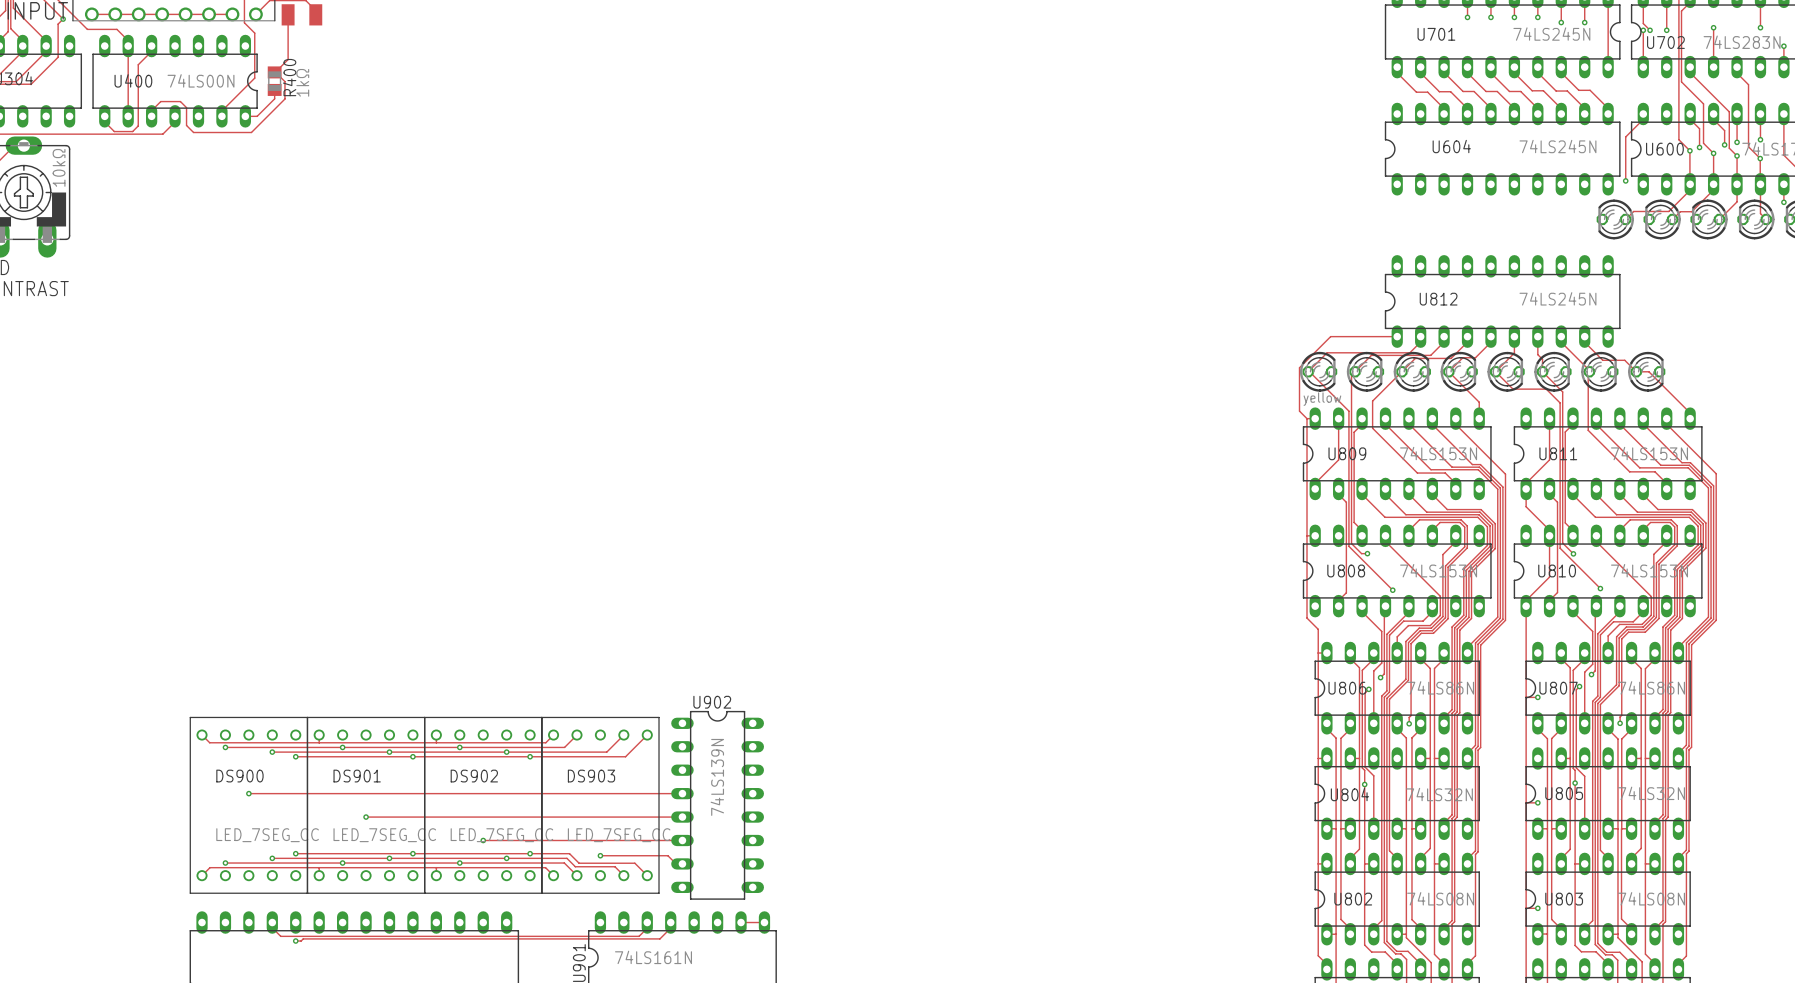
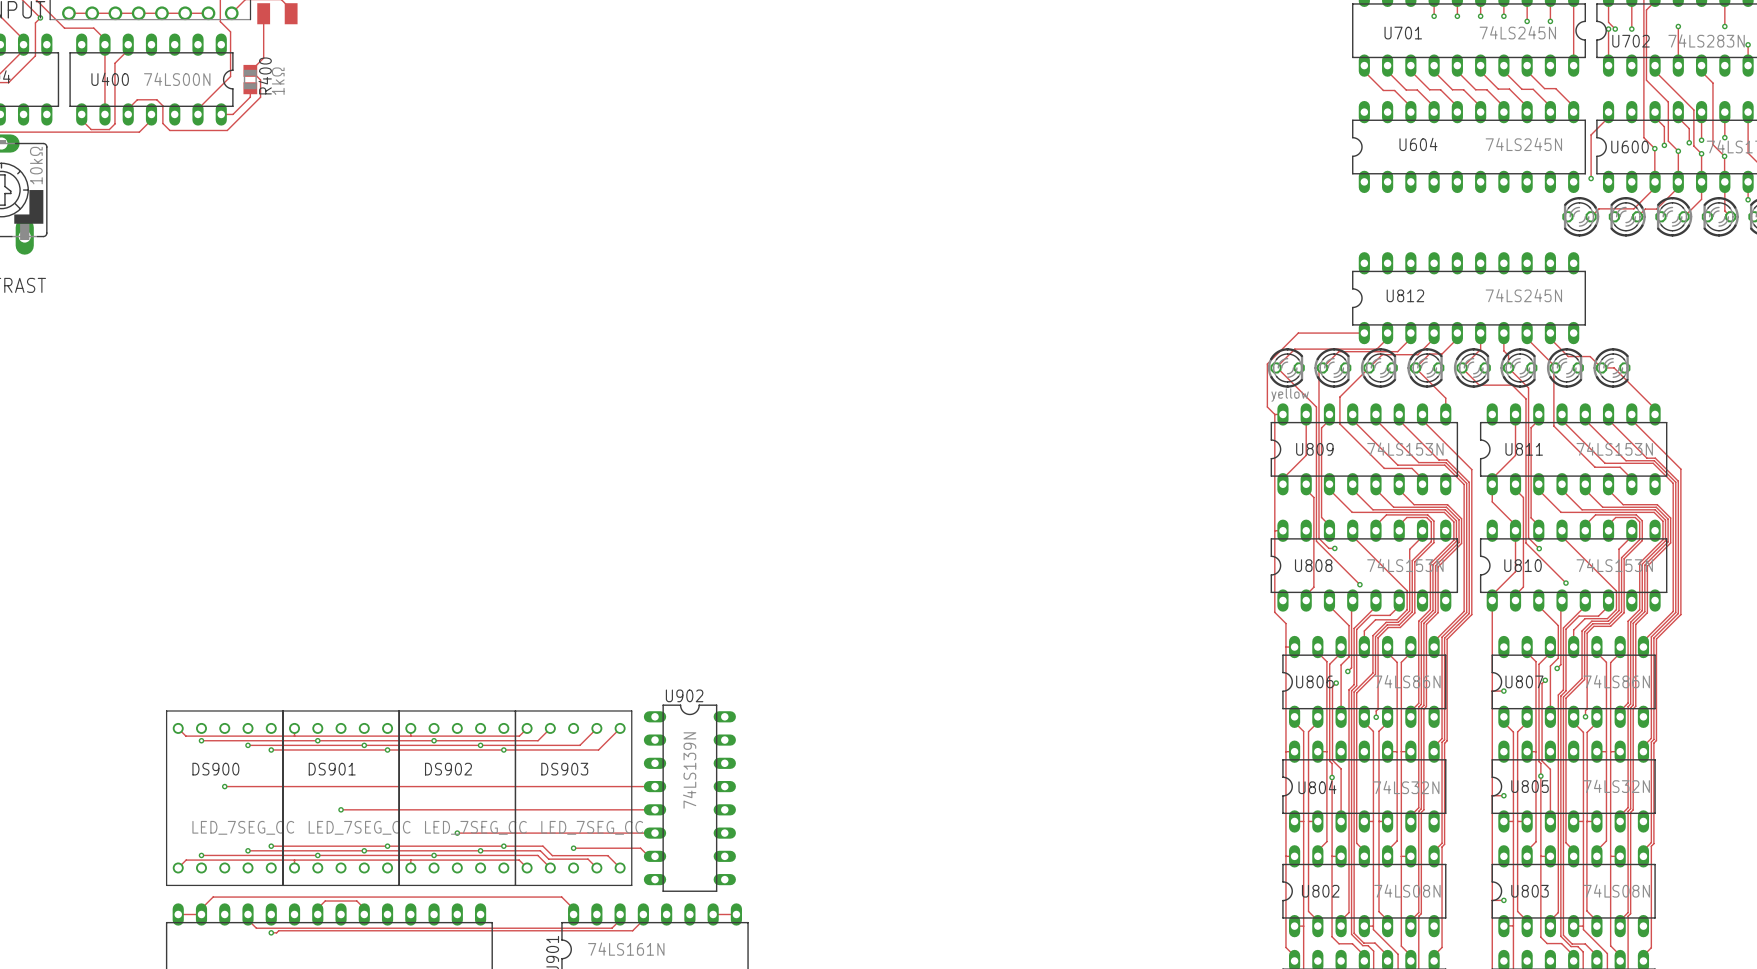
track: none -> (178, 914) (201, 914) (201, 908) (213, 897) (561, 897) (573, 908) (573, 914)
track: none -> (317, 914) (317, 908) (325, 901) (356, 901) (364, 908) (364, 914)

